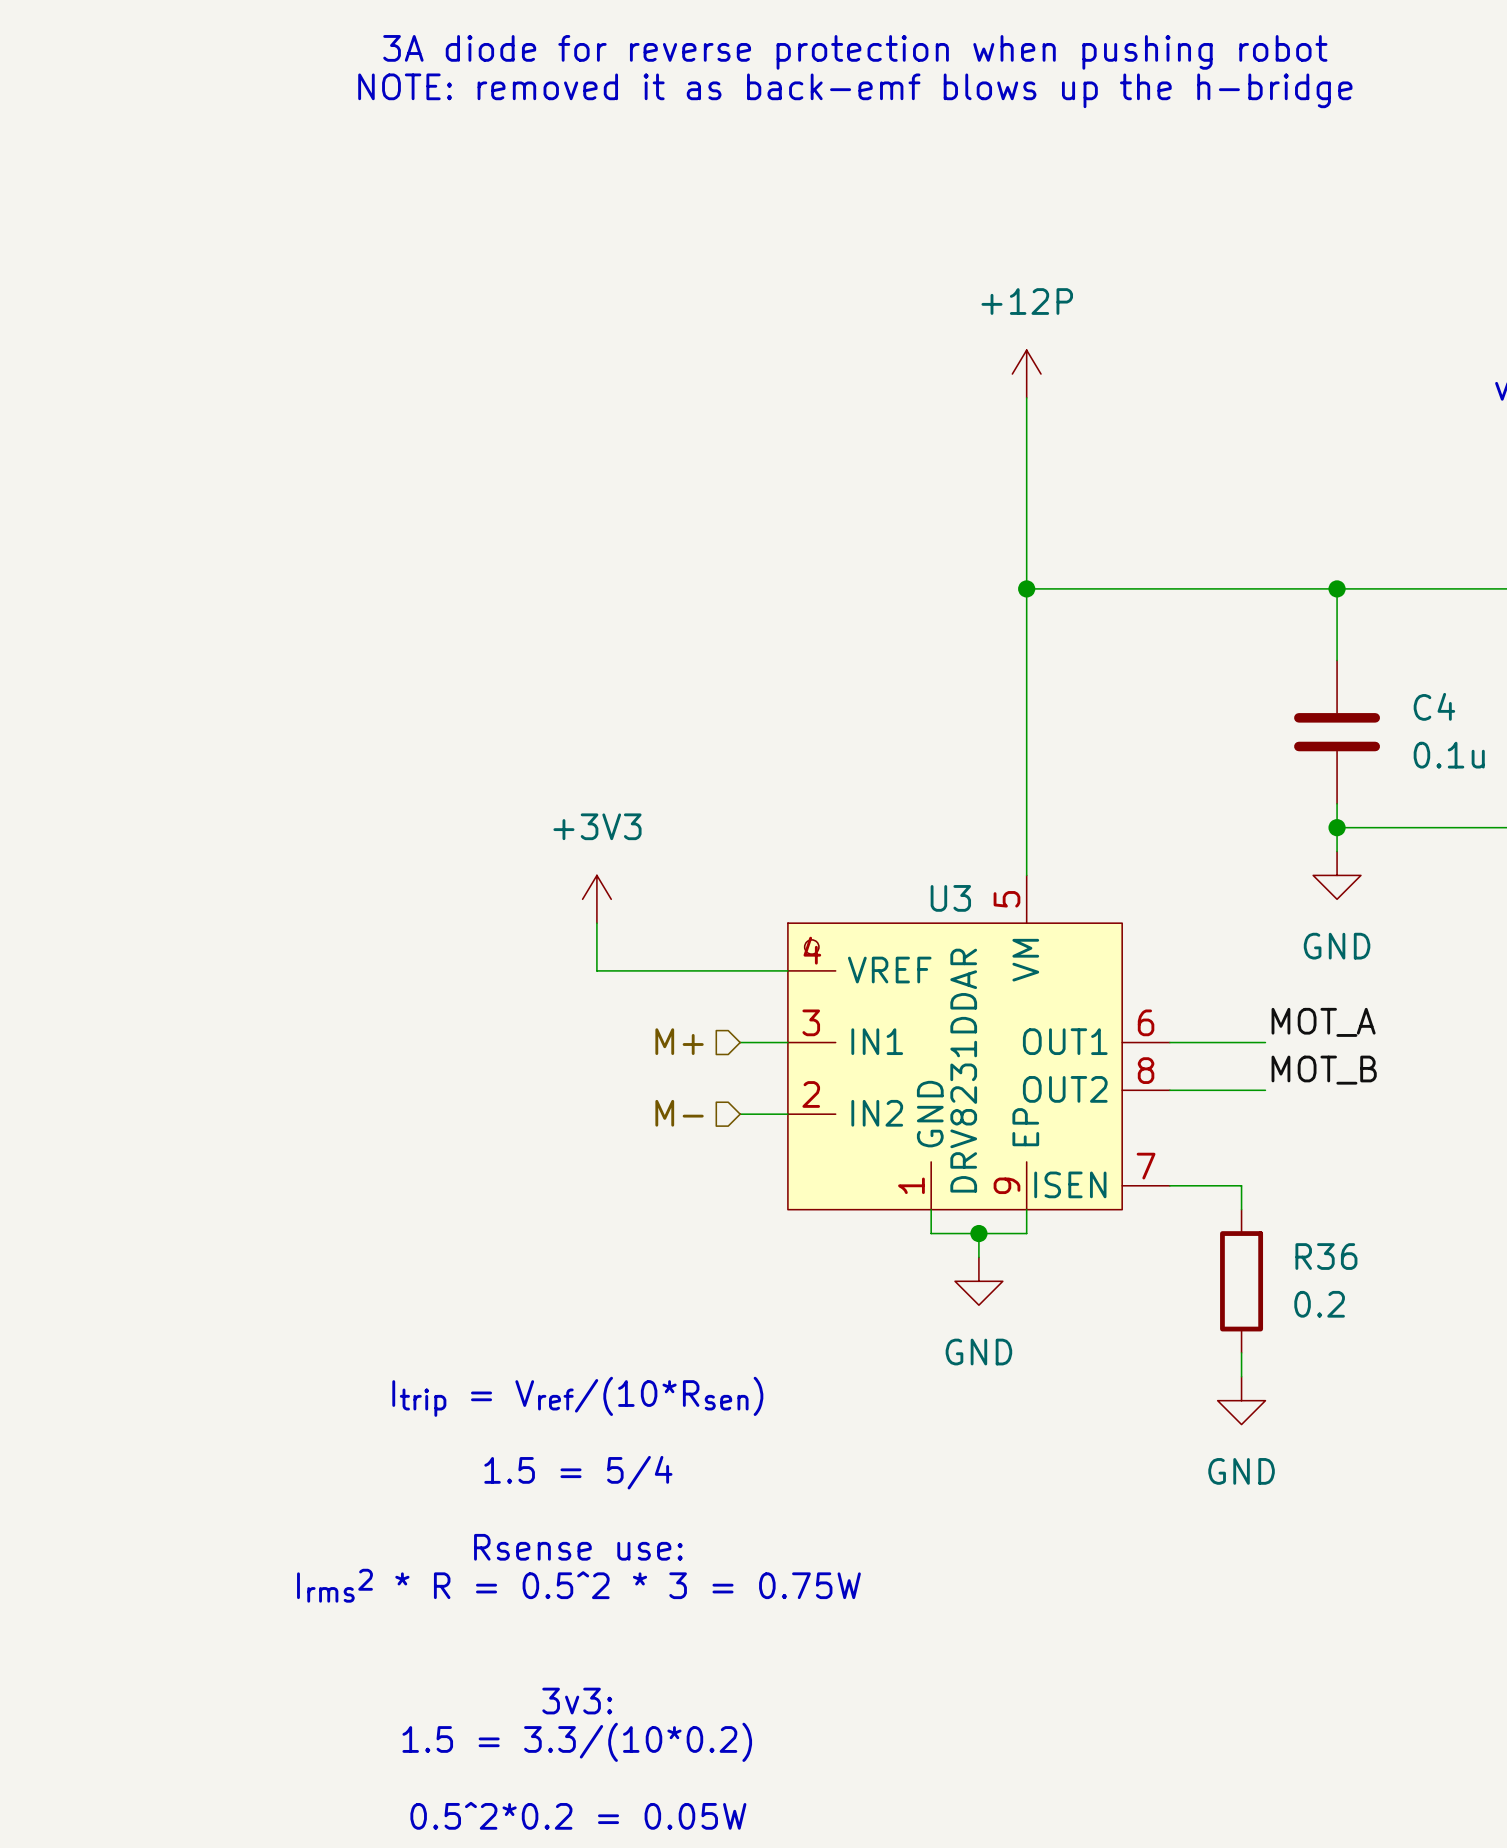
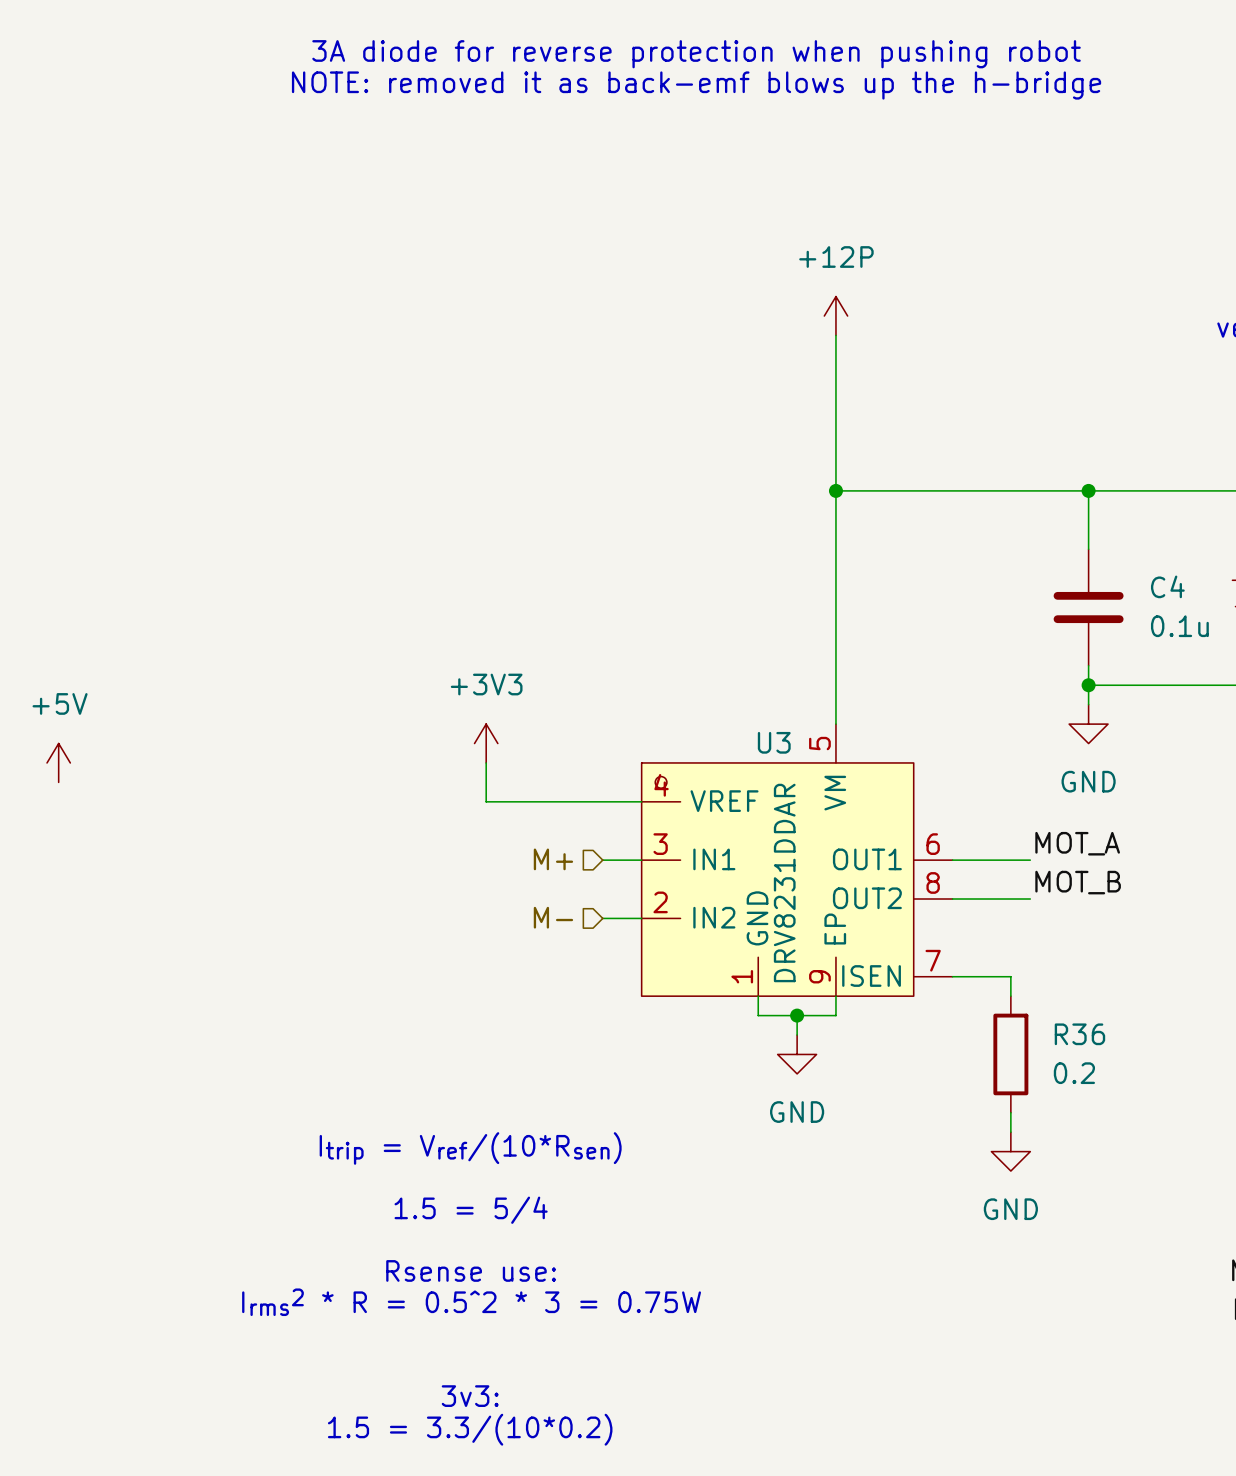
power symbol: none -> +5V (58, 762)

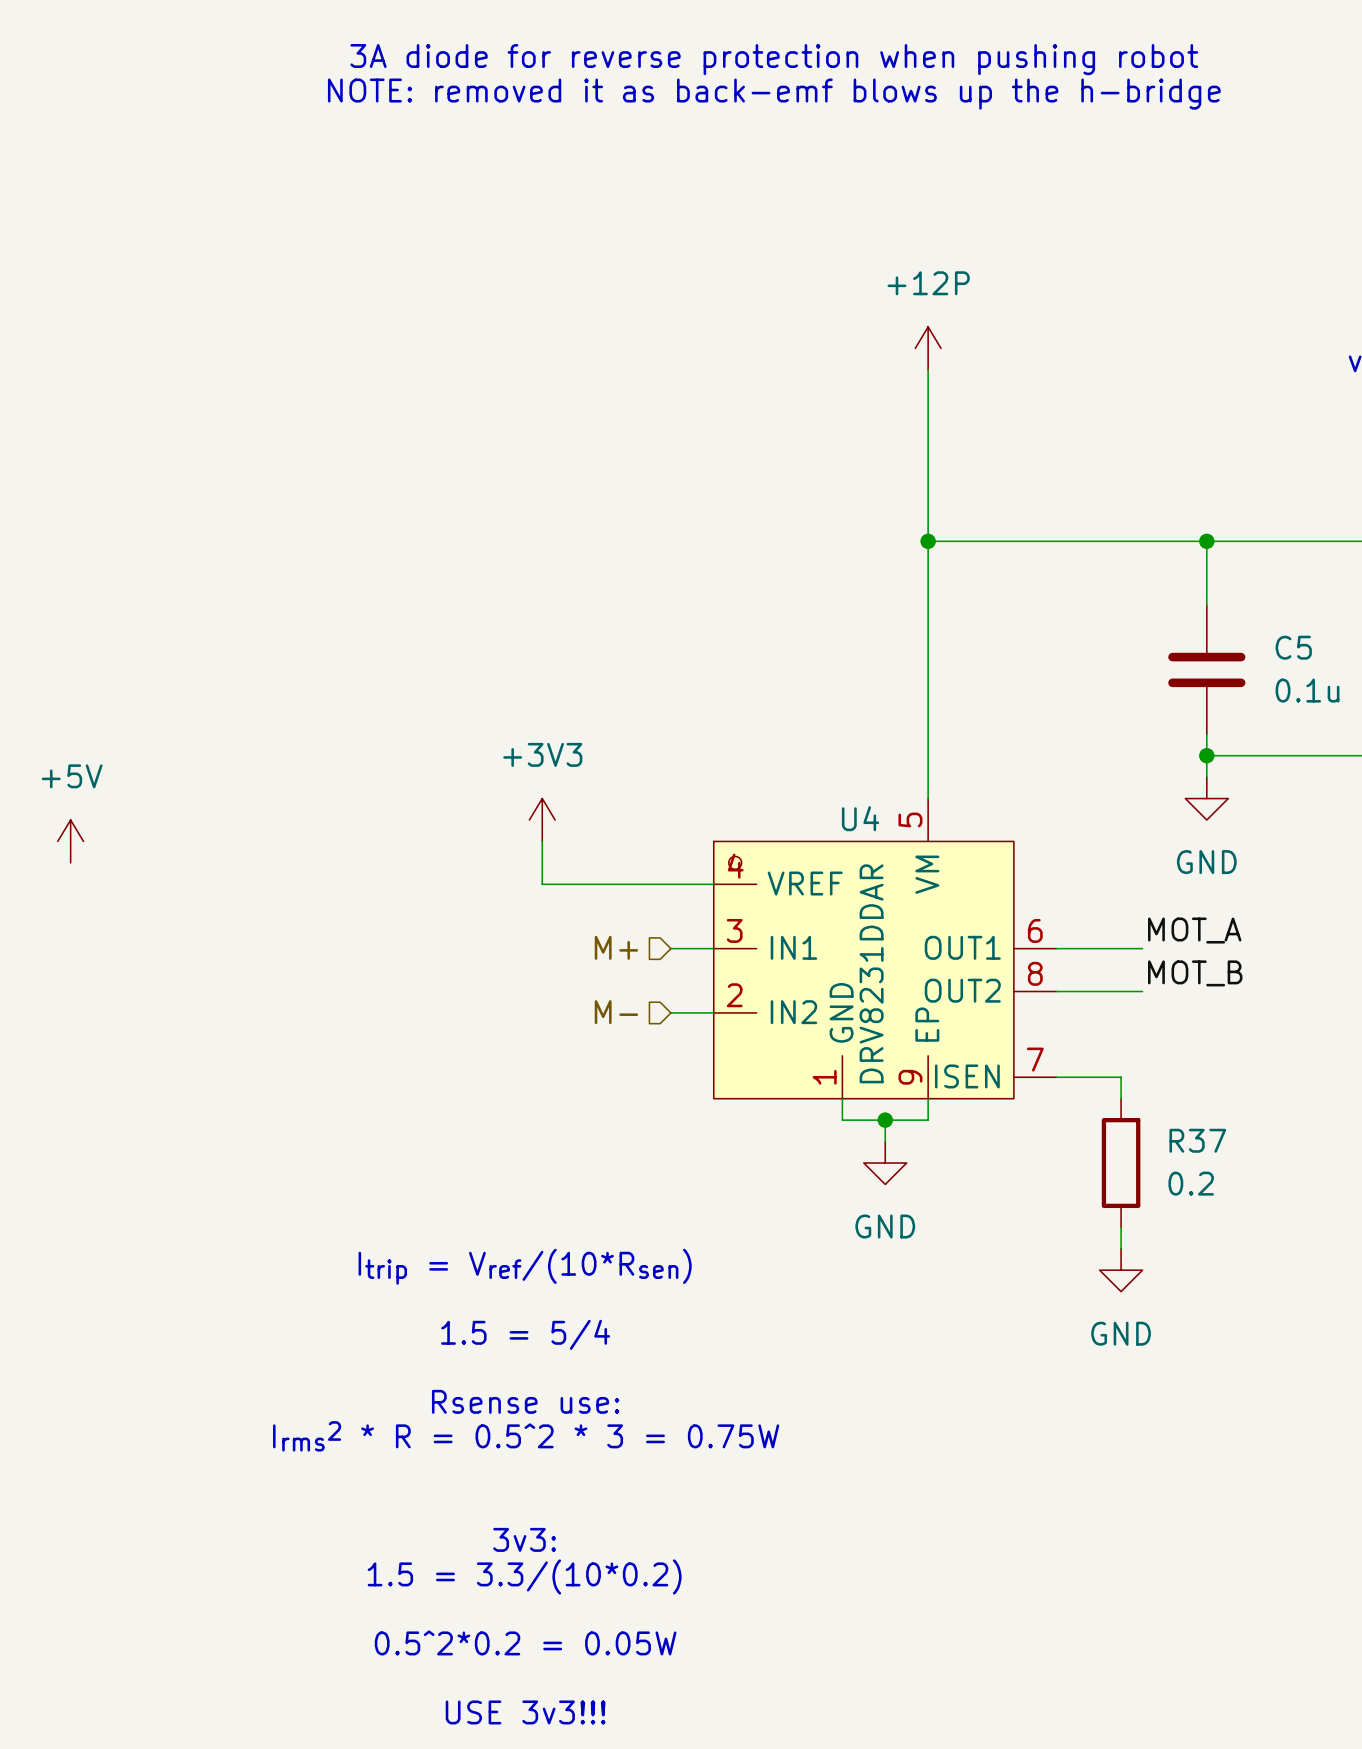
C4 name: C4 (1167, 586) -> C5 (1293, 647)
U3 name: U3 (774, 742) -> U4 (860, 818)
R36 name: R36 (1079, 1034) -> R37 (1197, 1140)

